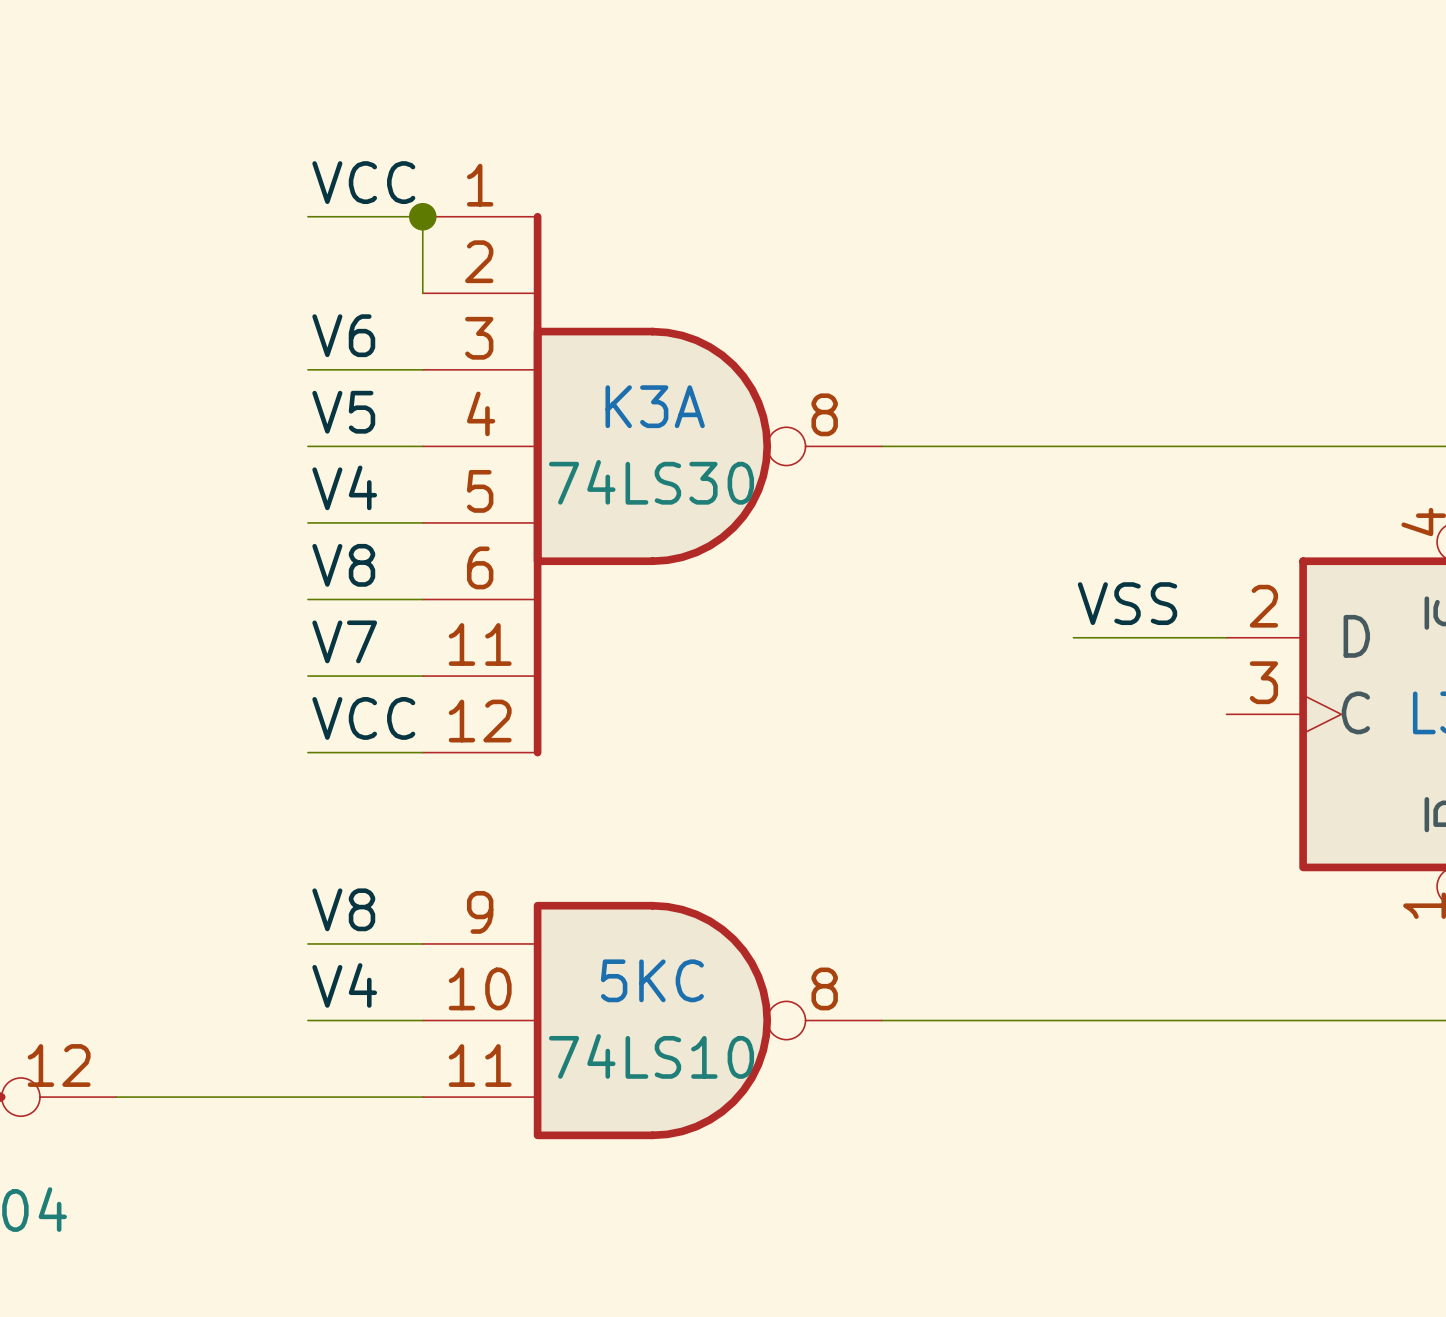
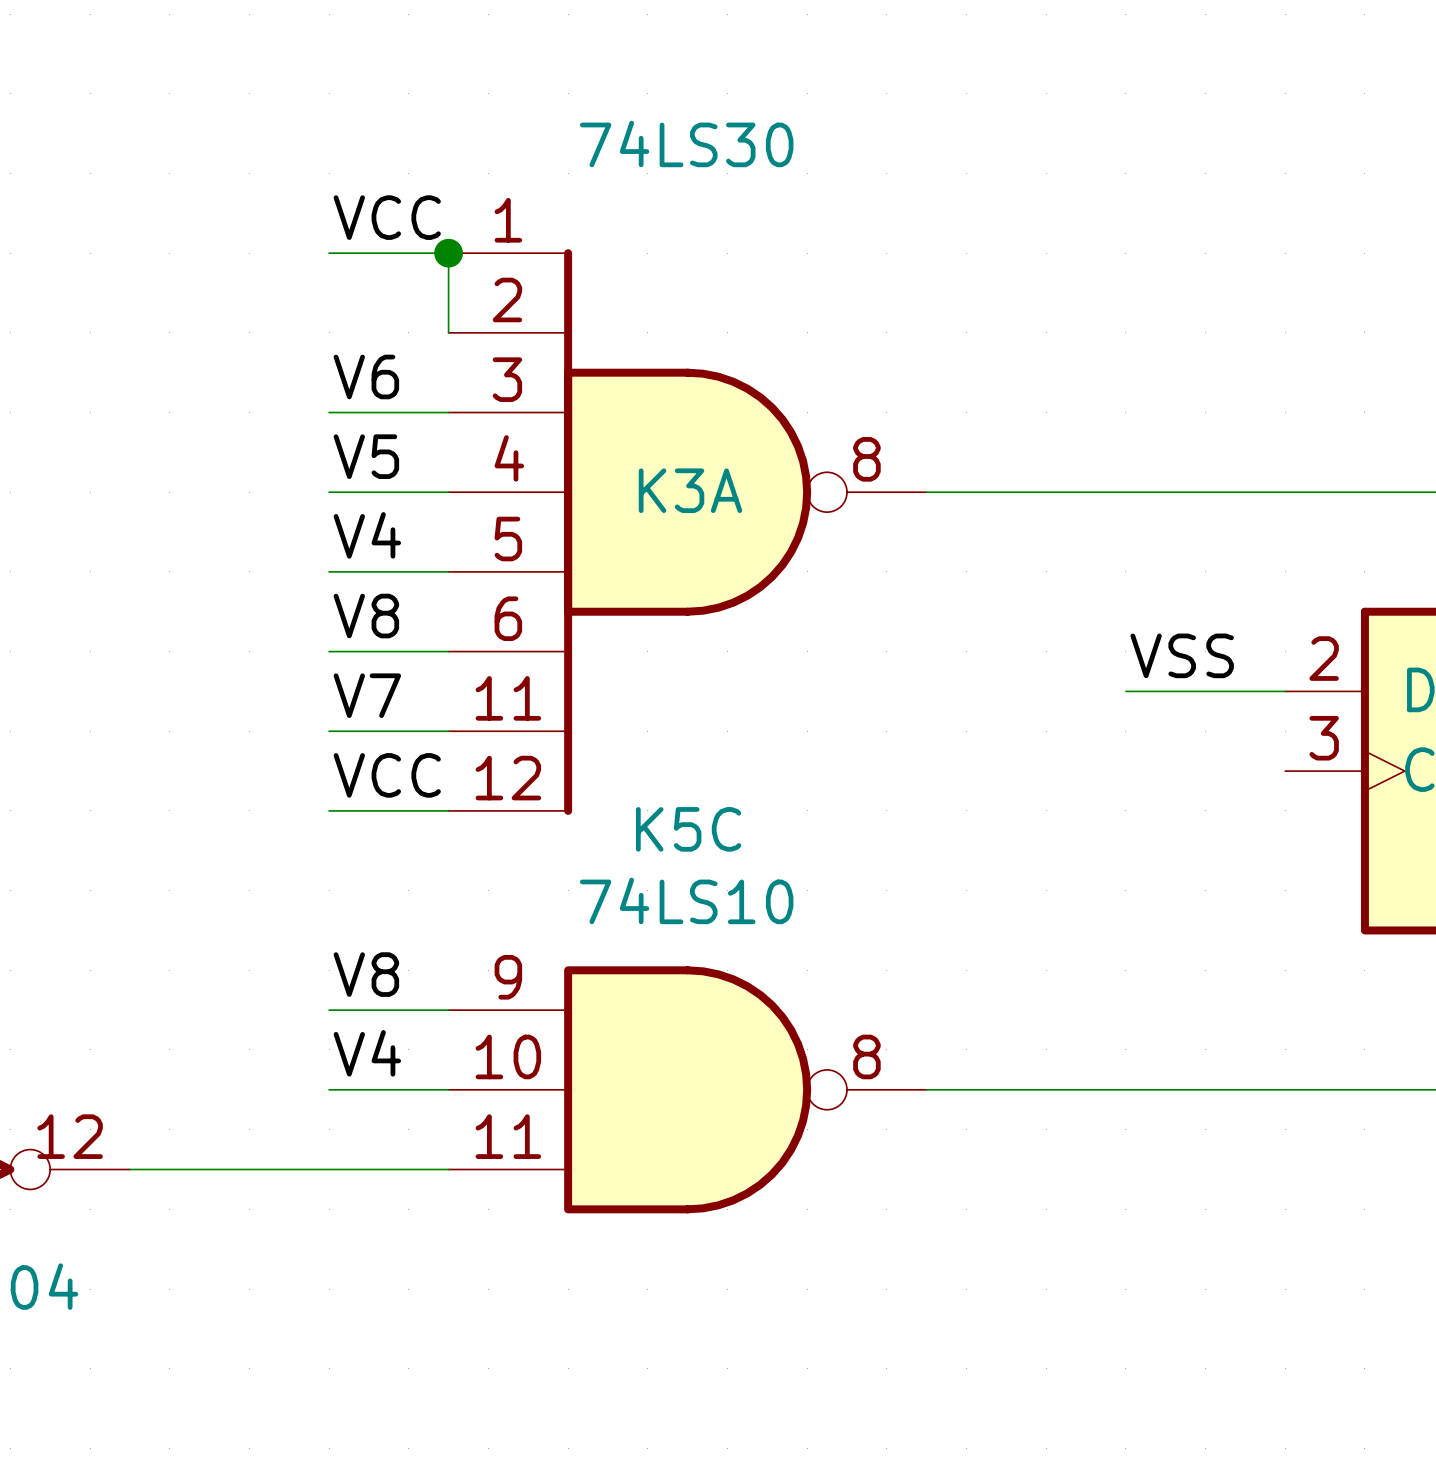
K3A name position: K3A (655, 406) -> K3A (690, 490)
K3A value position: 74LS30 (651, 482) -> 74LS30 (686, 143)
5KC name: 5KC (652, 980) -> K5C (688, 829)
5KC value position: 74LS10 (651, 1056) -> 74LS10 (686, 900)

